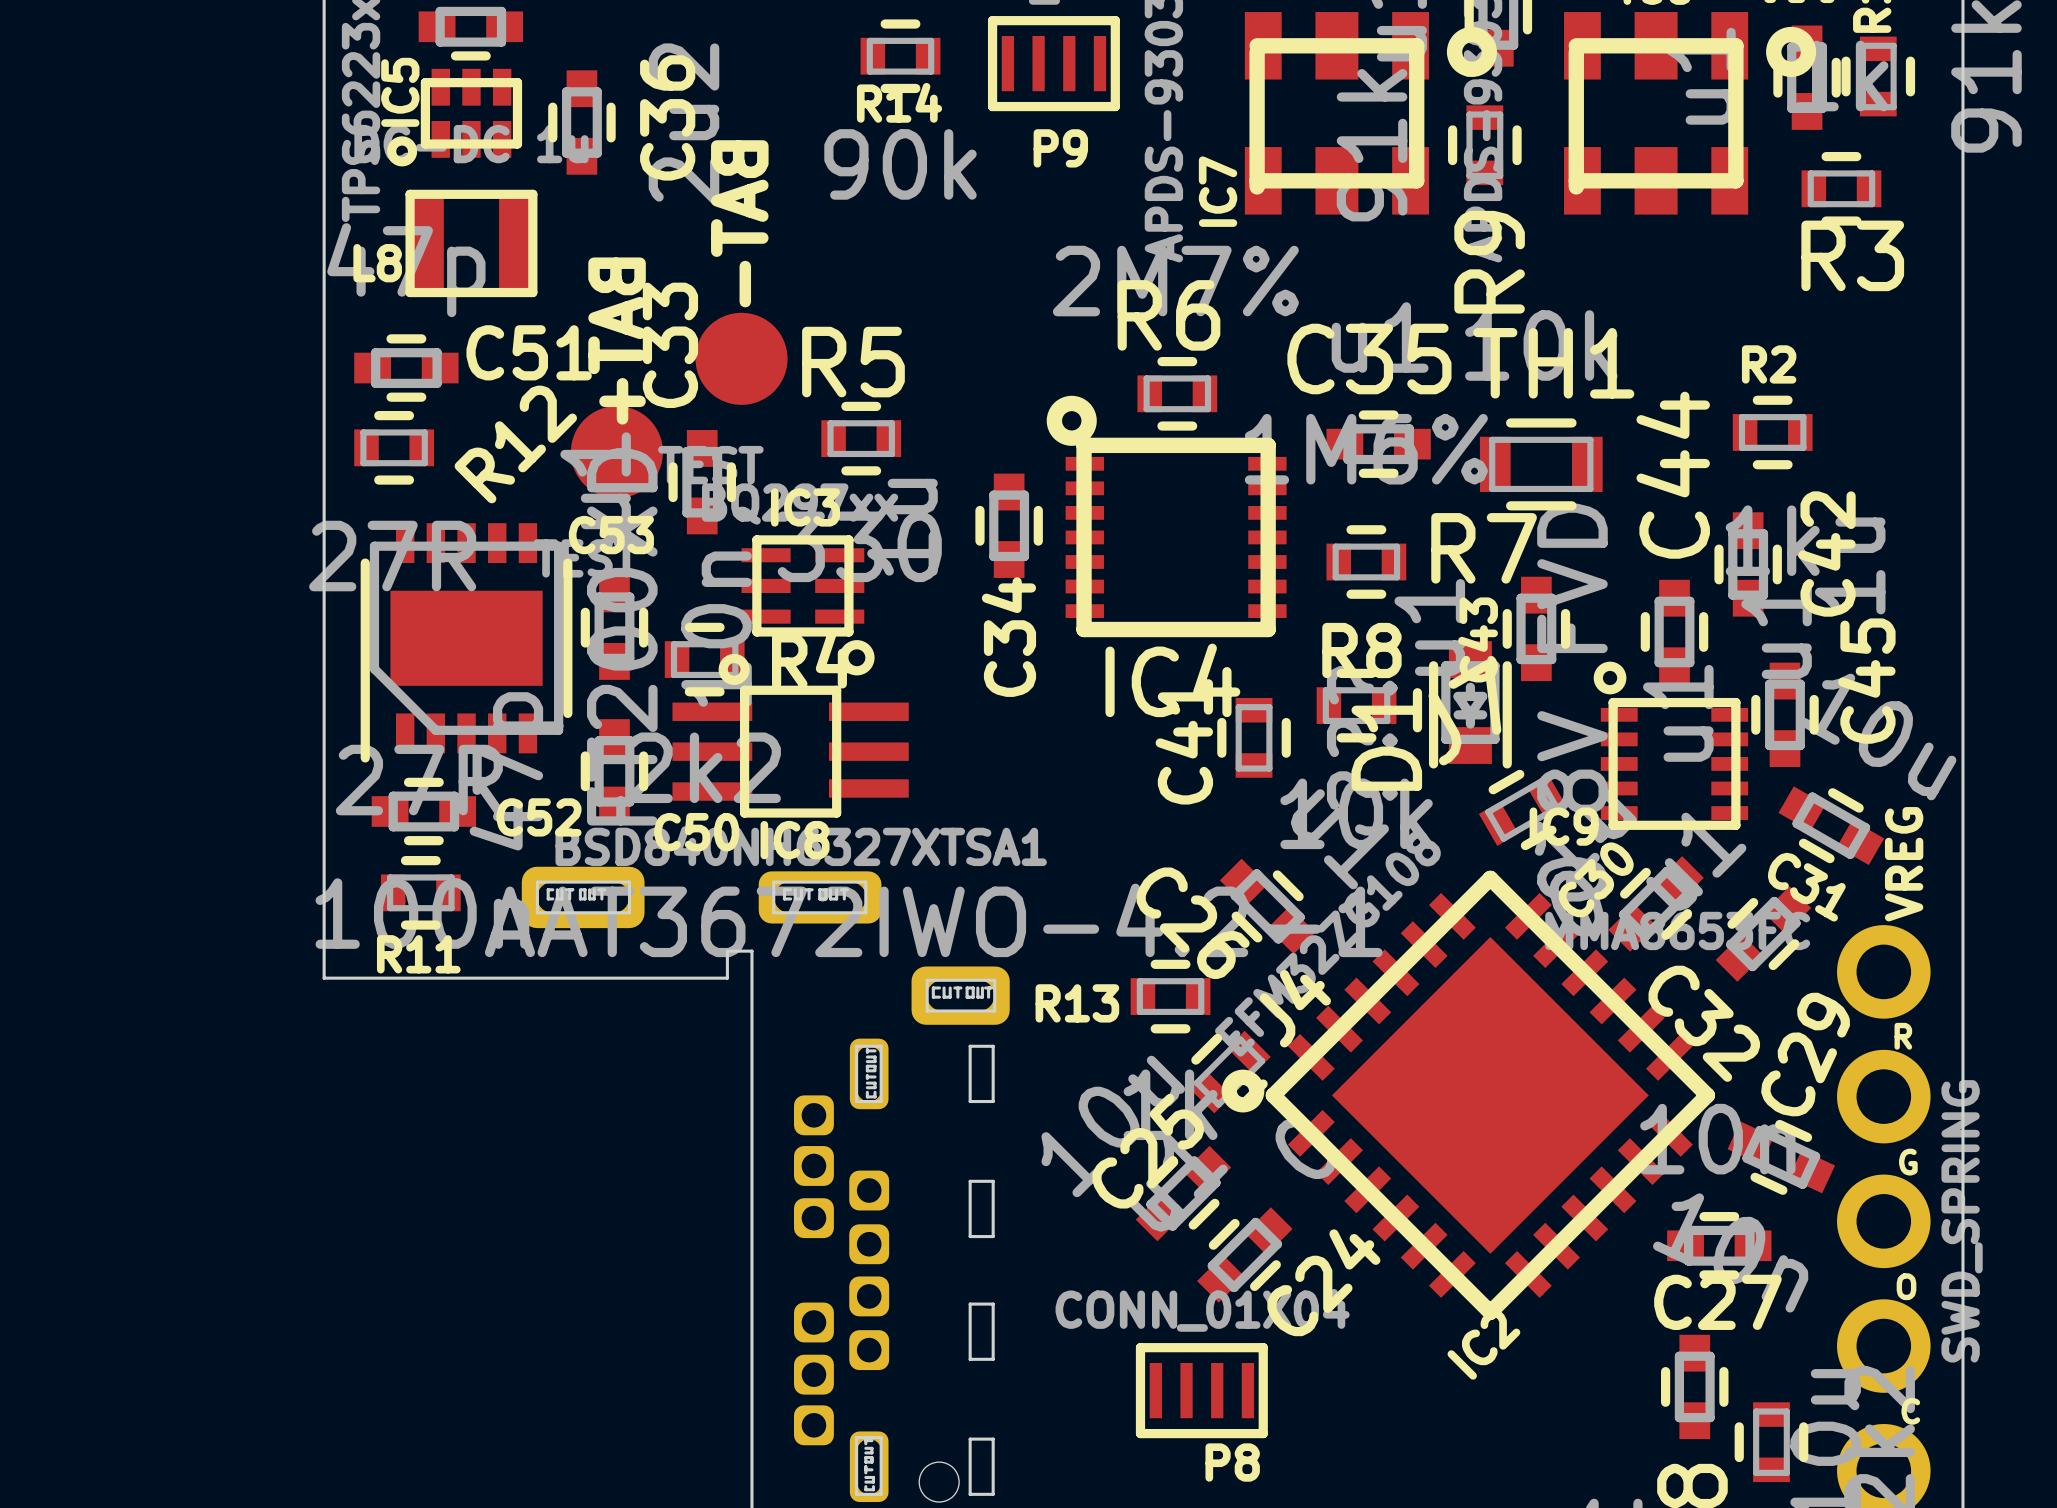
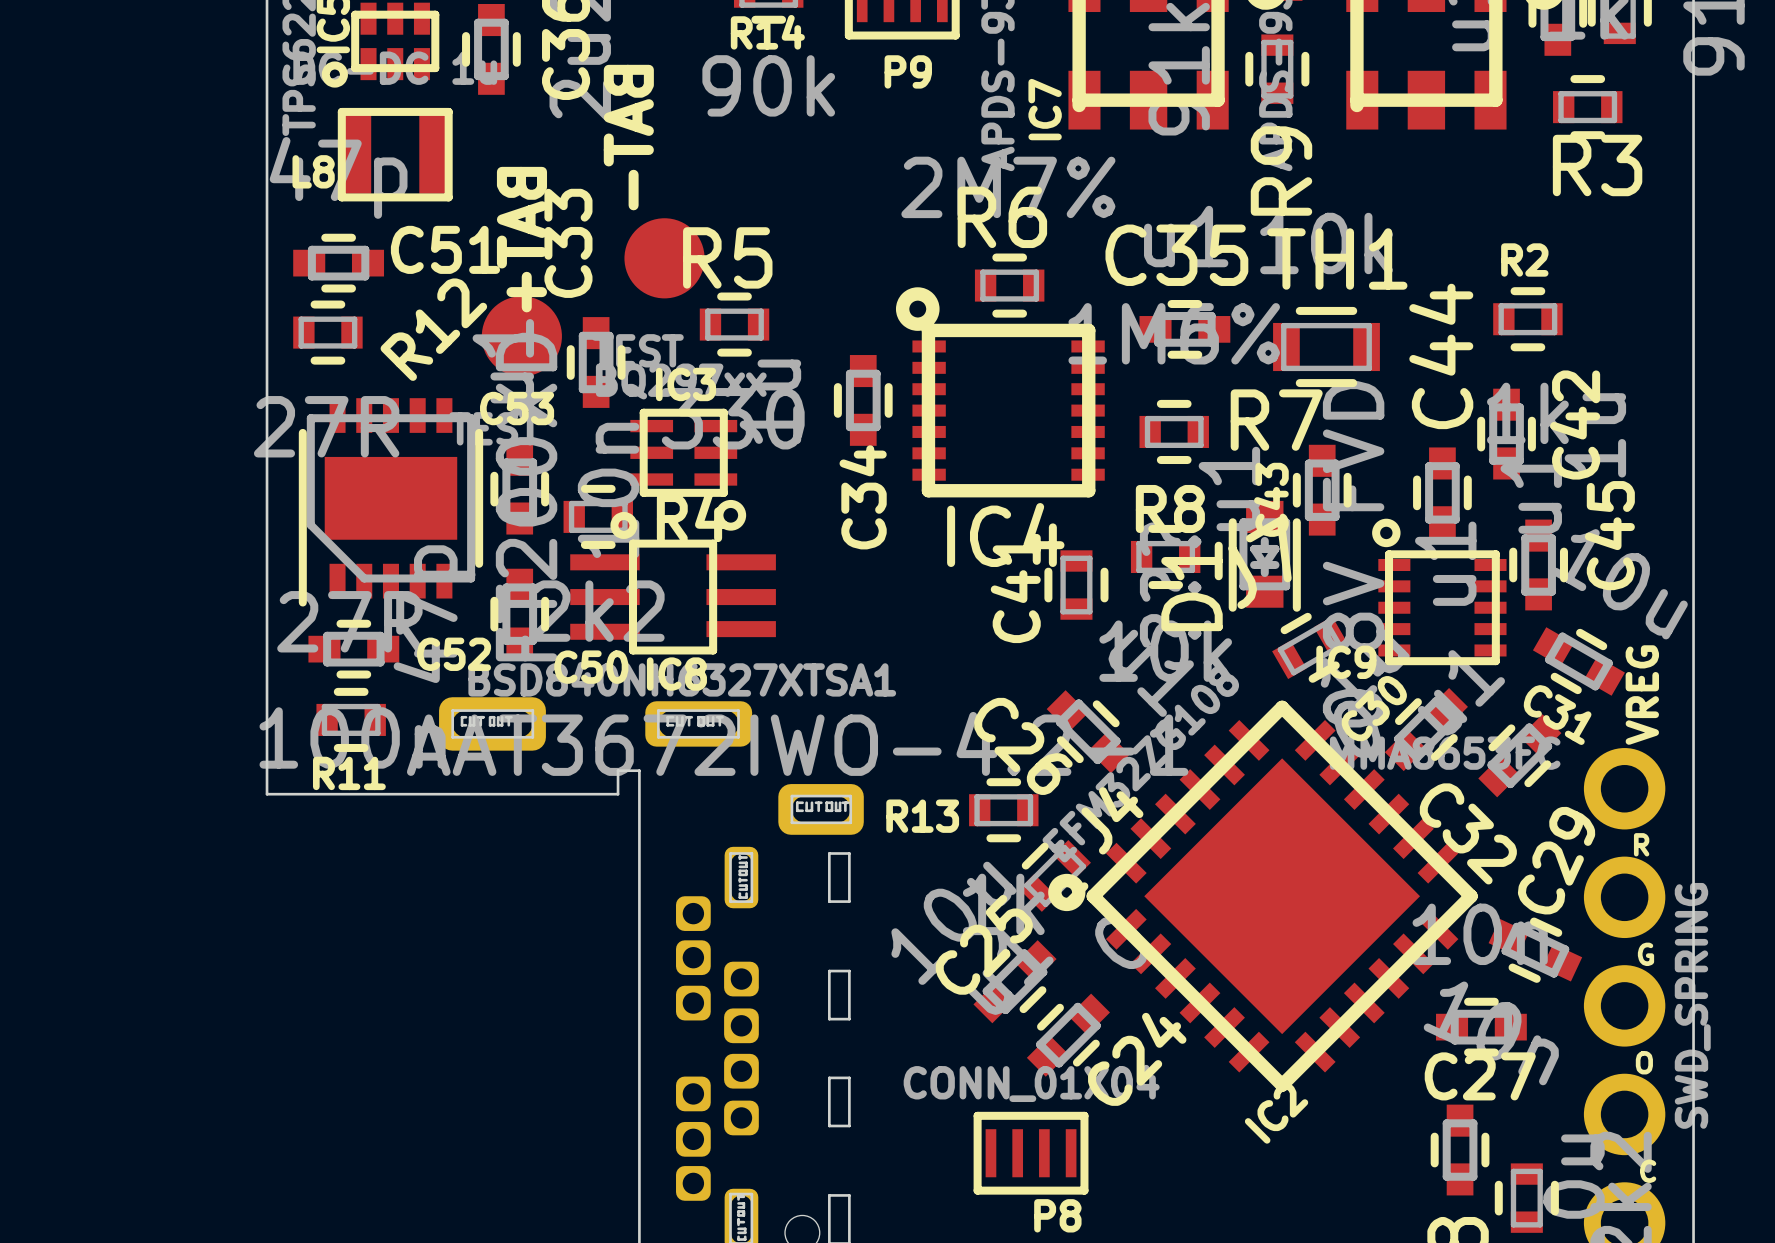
part position: (741, 358) -> (664, 258)

